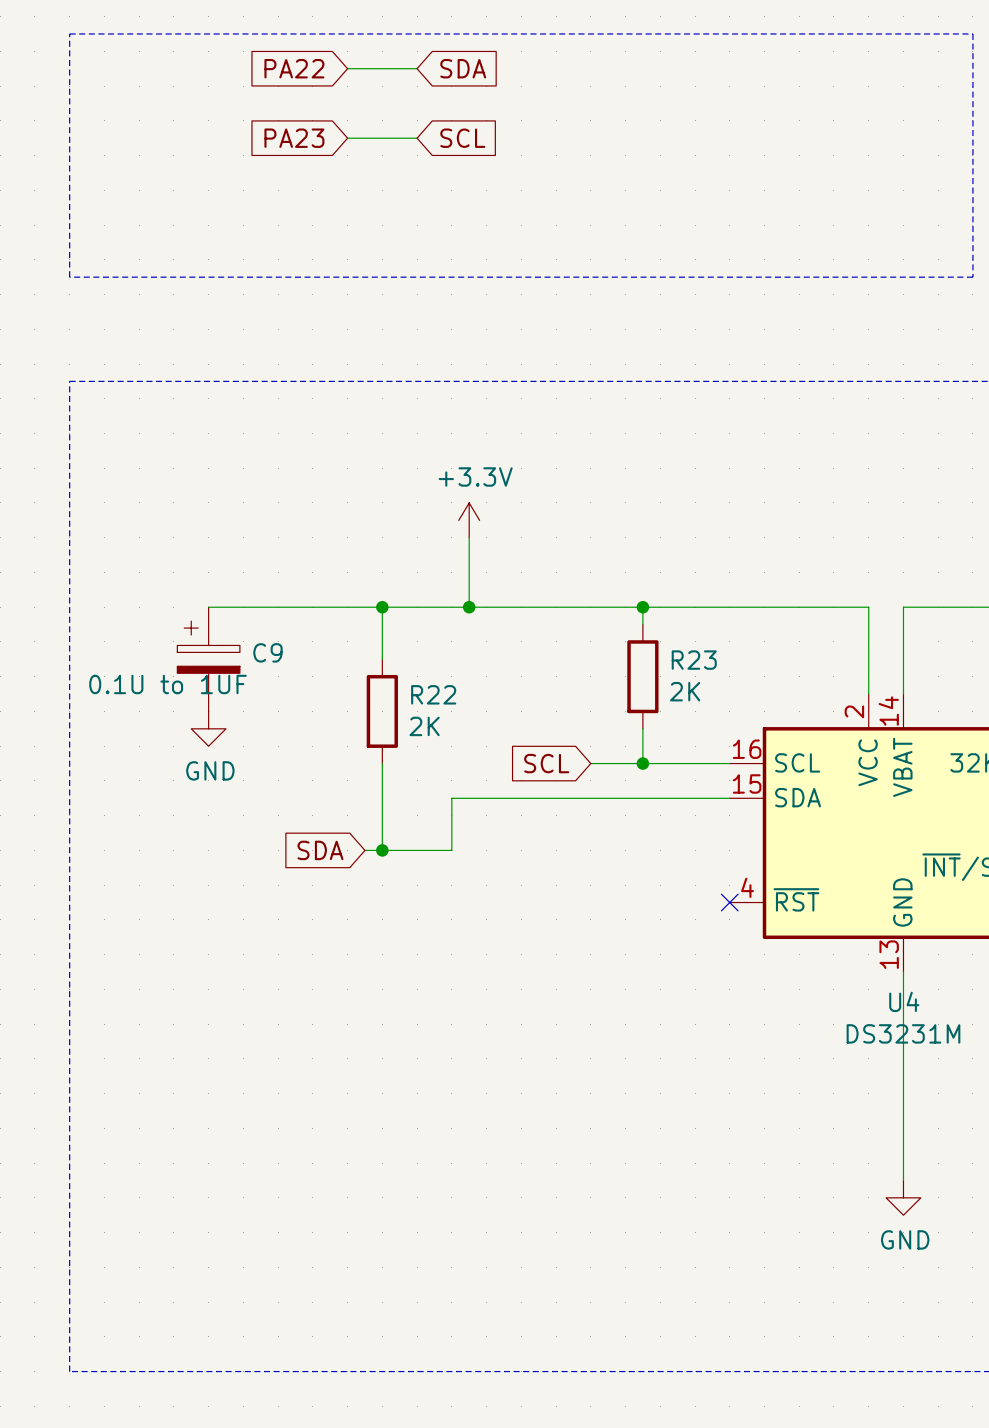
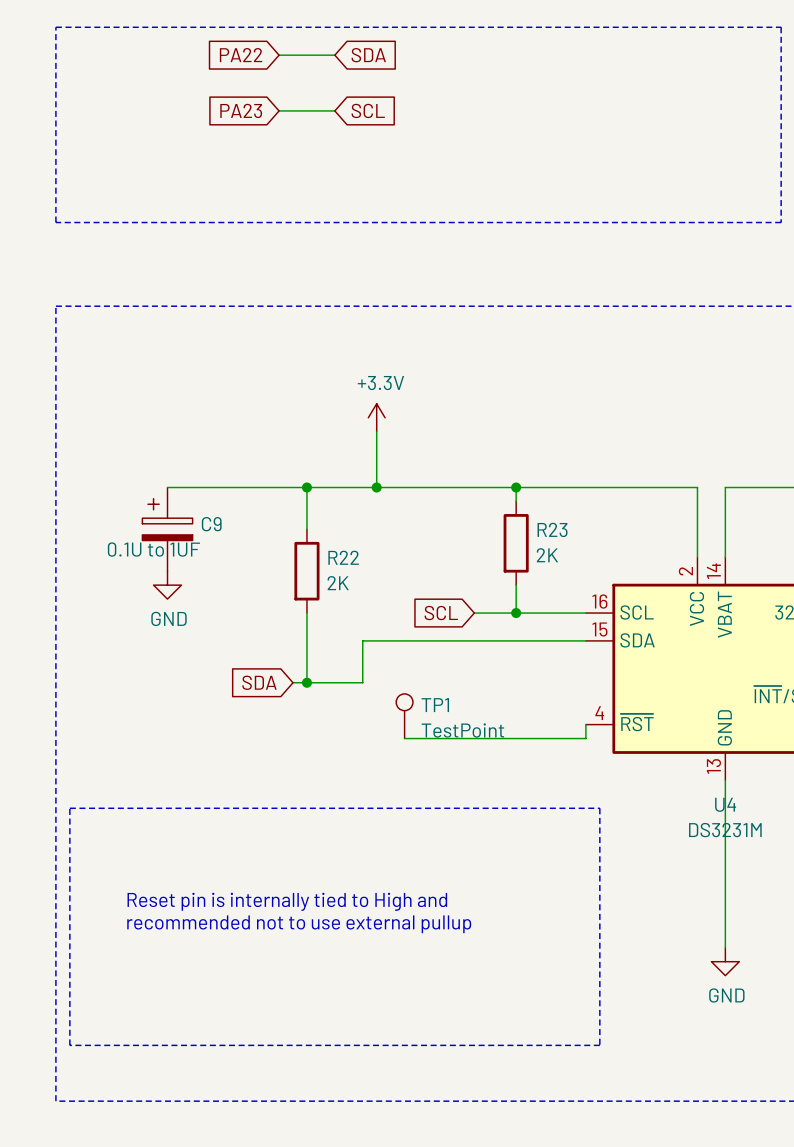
TP1: none -> TestPoint (404, 716)
wire: none -> (585, 724) (585, 738) (404, 738)
no-connect mark: (729, 902) -> none
line: none -> (69, 808) (69, 1045) (599, 1045) (599, 808) (69, 808)
text: none -> Reset pin is internally tied to High and (287, 901)
text: none -> recommended not to use external pullup (299, 924)

